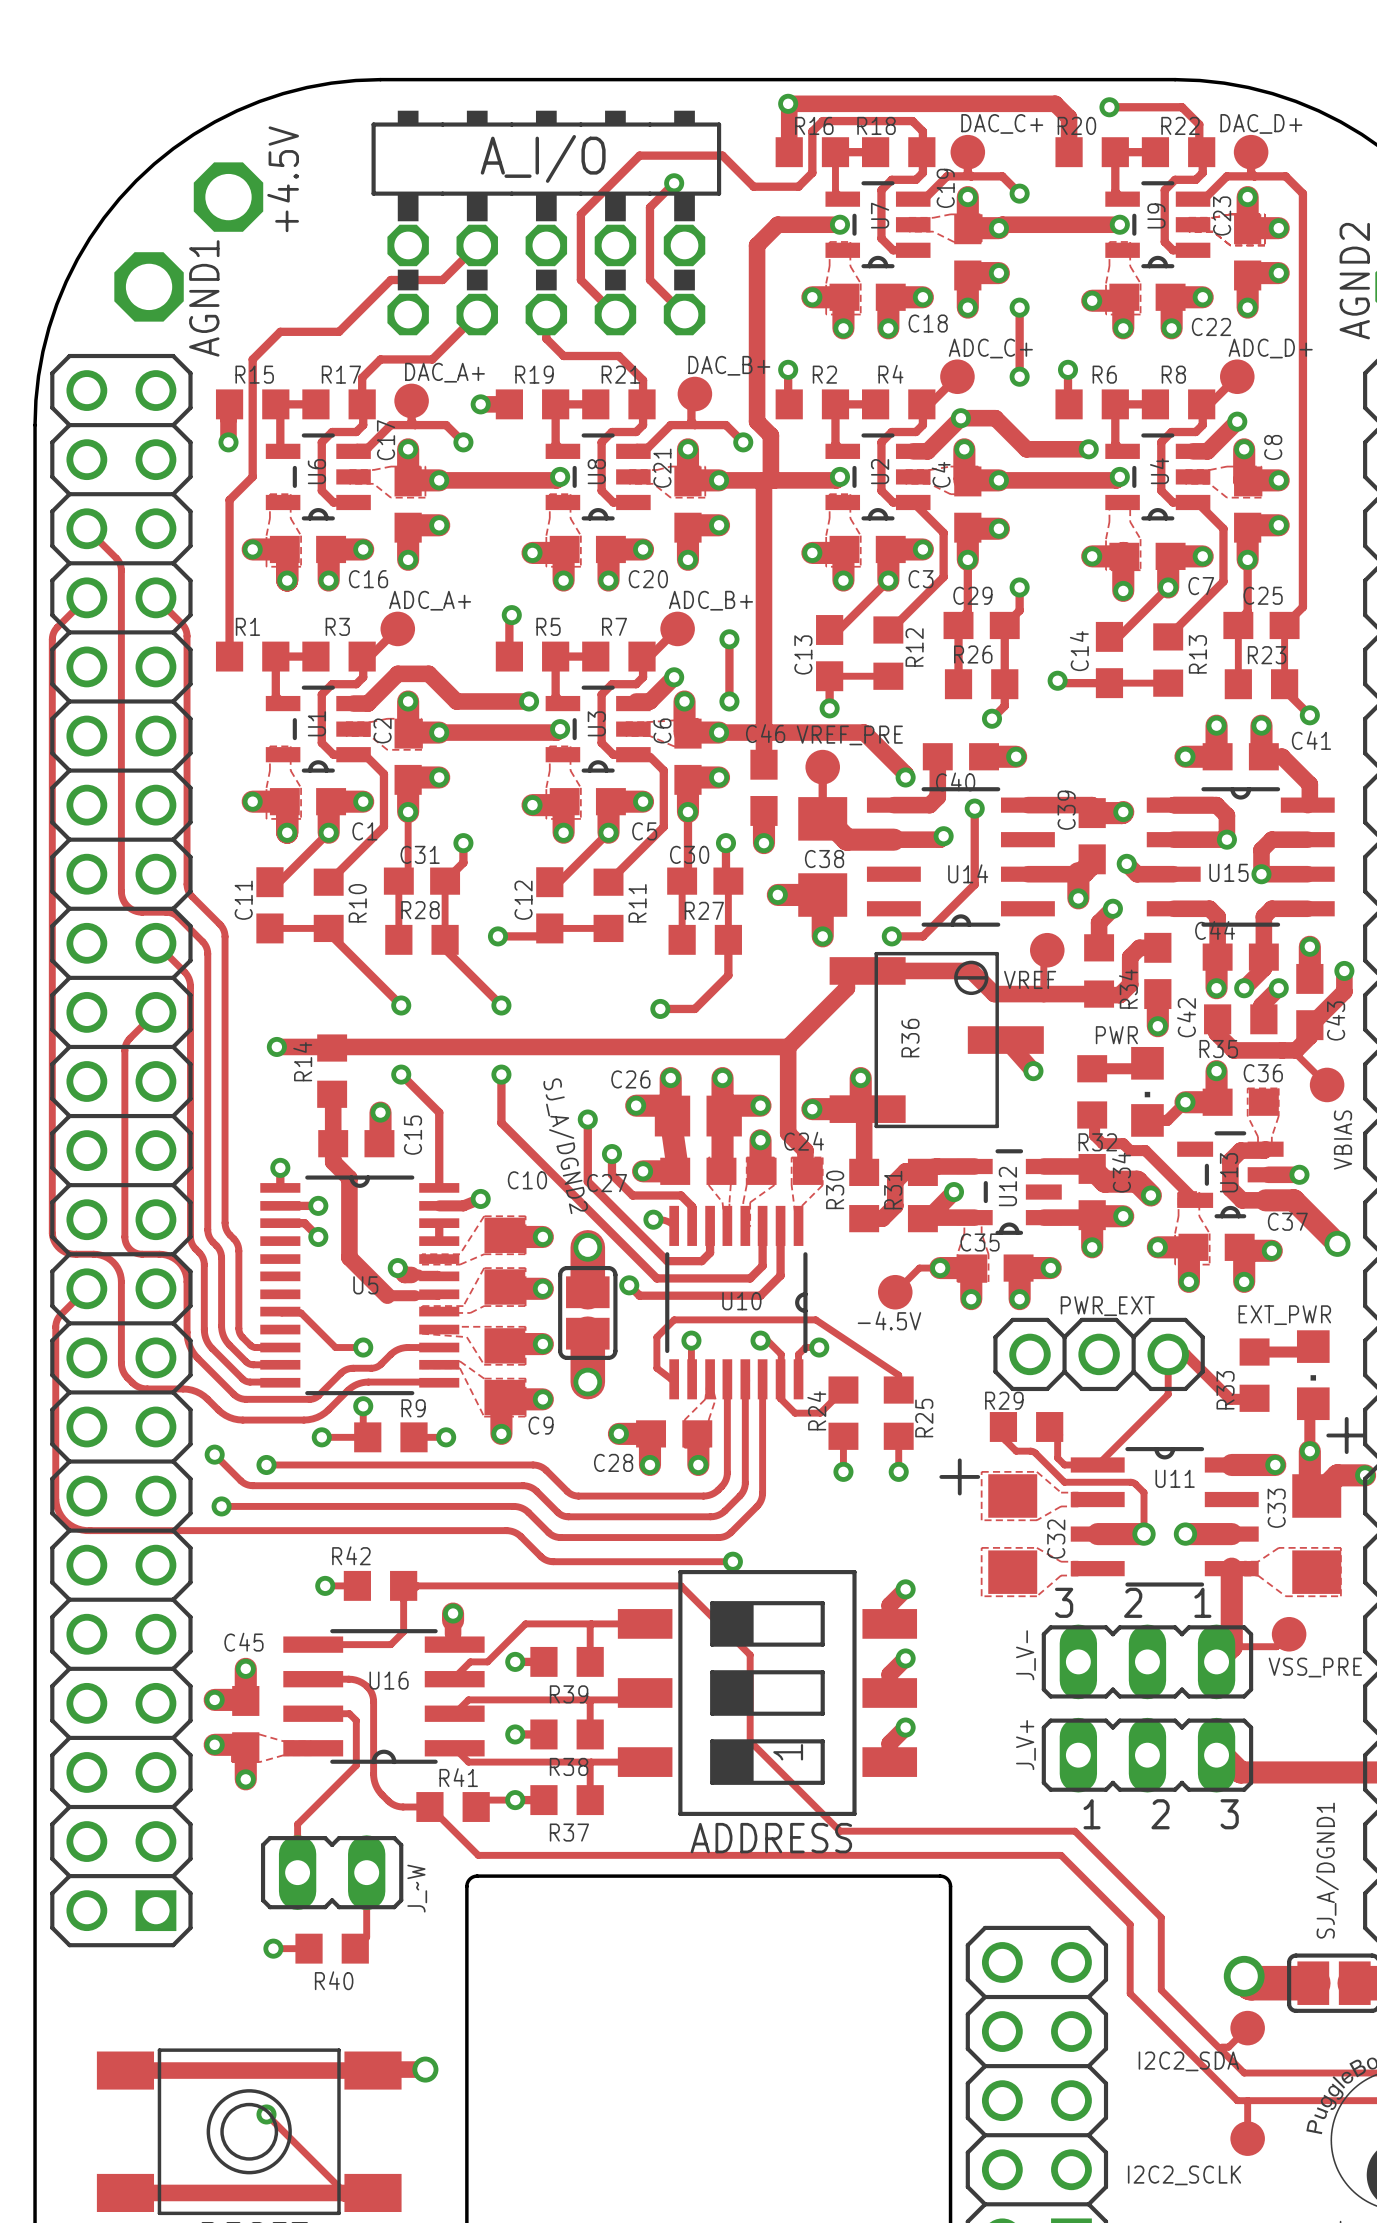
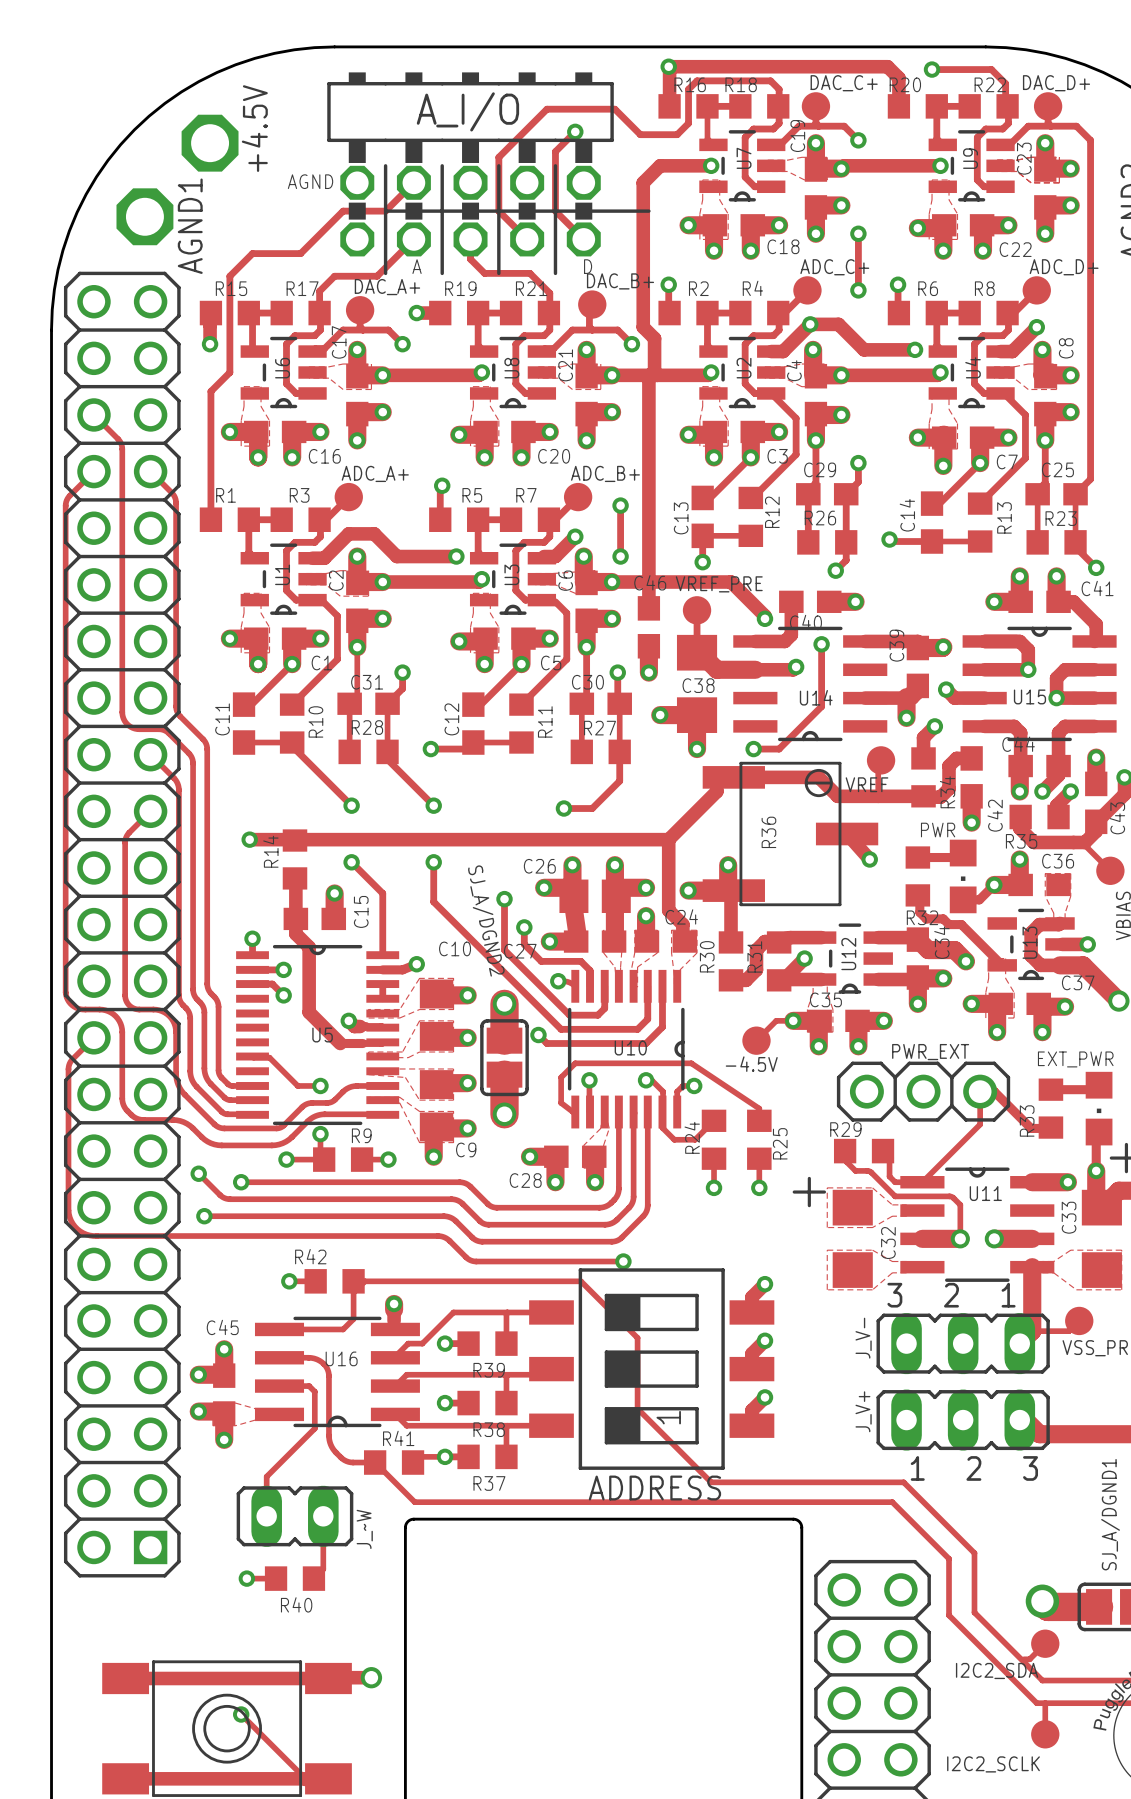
line: none -> (385, 165) (385, 273)
line: none -> (442, 165) (442, 273)
line: none -> (498, 165) (498, 273)
line: none -> (555, 165) (555, 273)
text: none -> AGND (310, 181)
line: none -> (385, 211) (648, 211)
text: none -> A (417, 266)
text: none -> D (588, 266)

